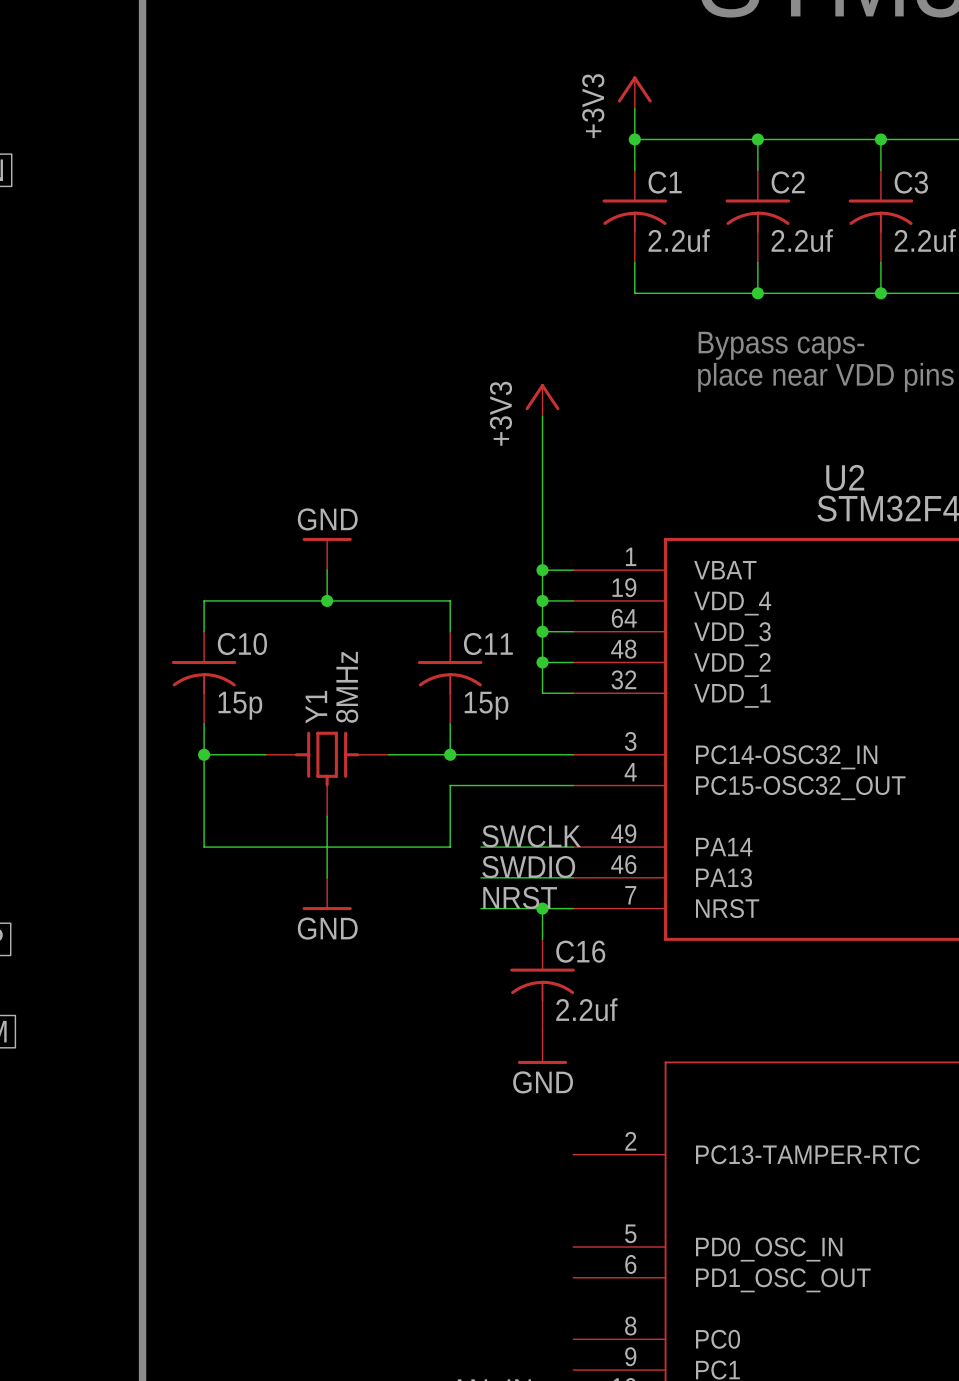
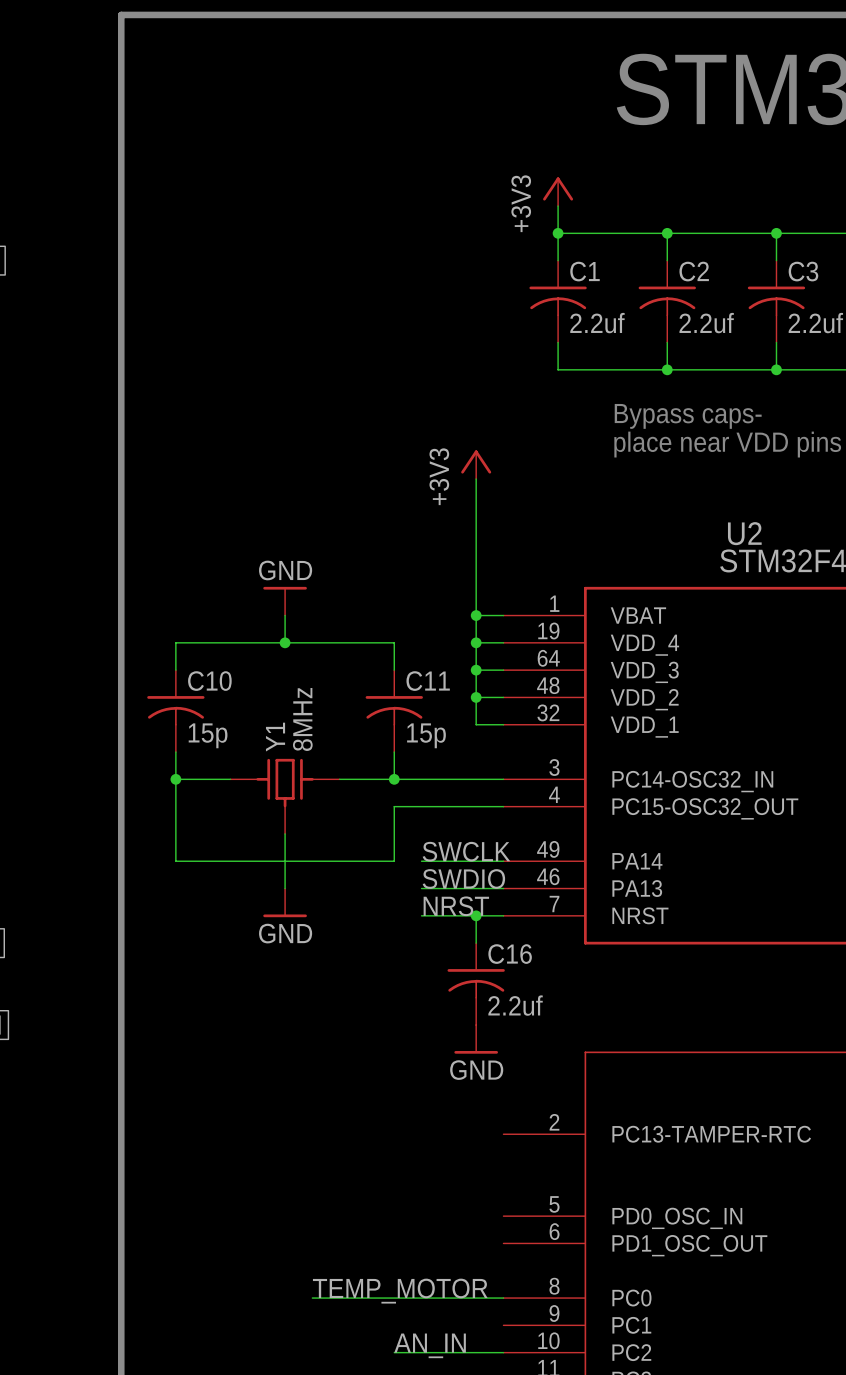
label: none -> TEMP_MOTOR (400, 1291)
wire: none -> (312, 1298) (503, 1298)

